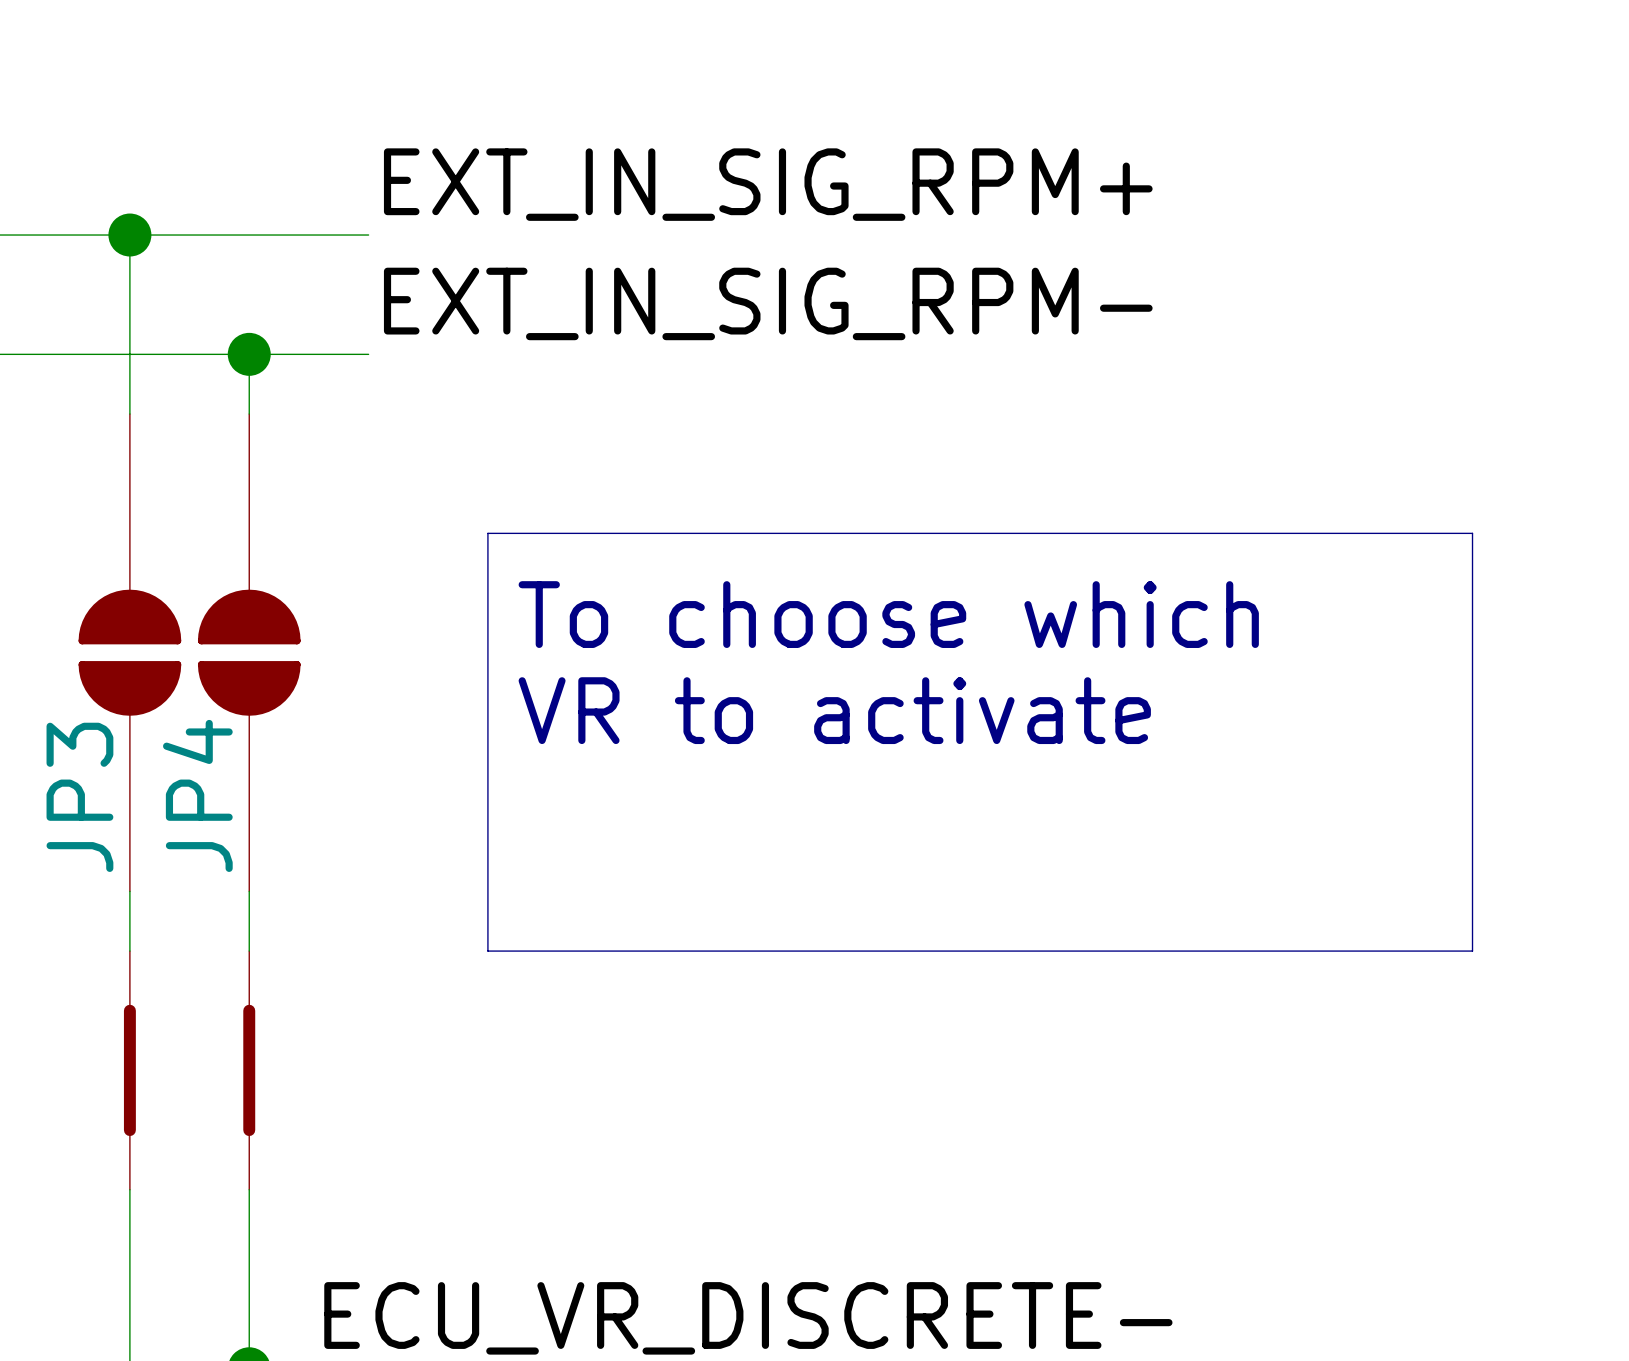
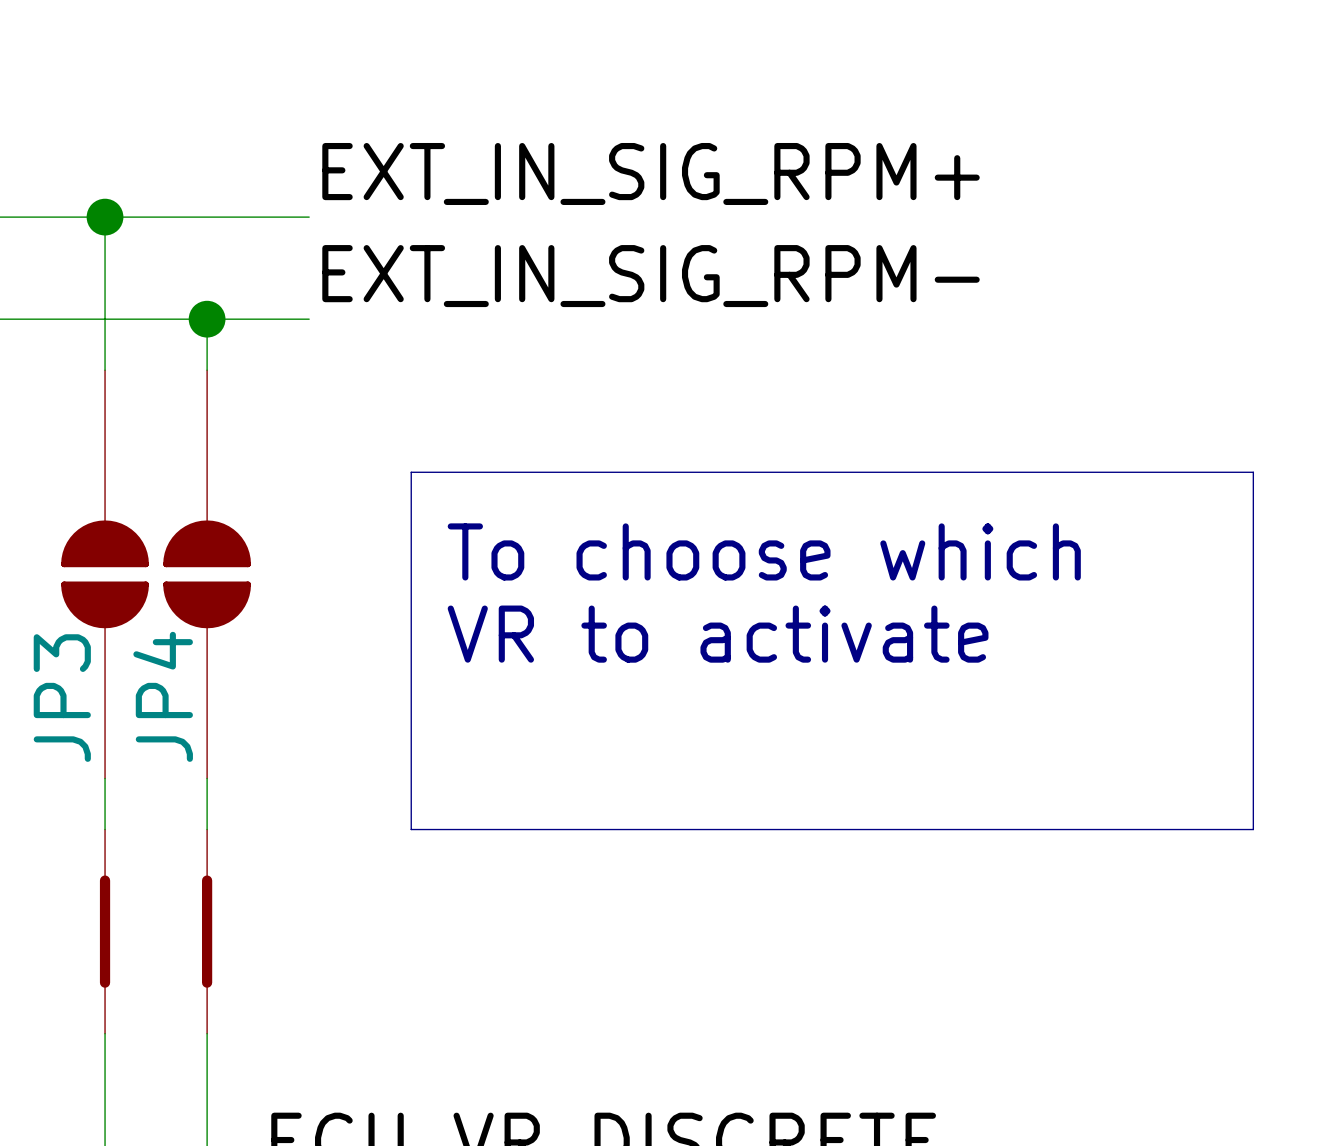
text position: To choose which (888, 614) -> To choose which (764, 551)
text position: VR to activate (834, 710) -> VR to activate (718, 634)

